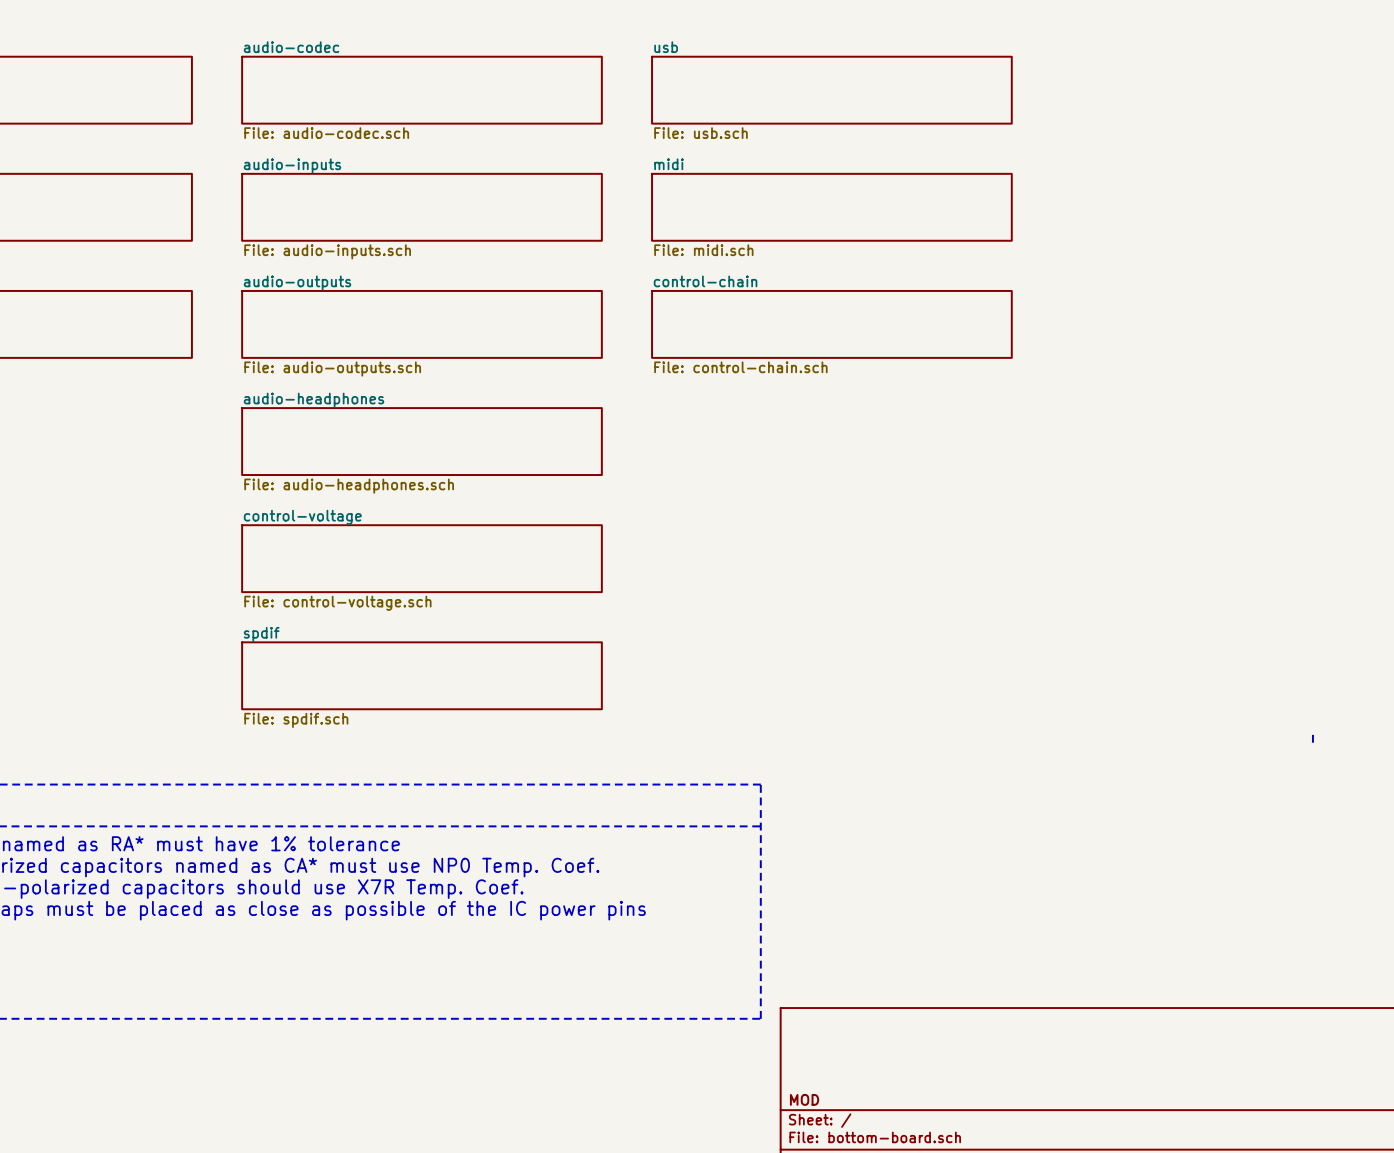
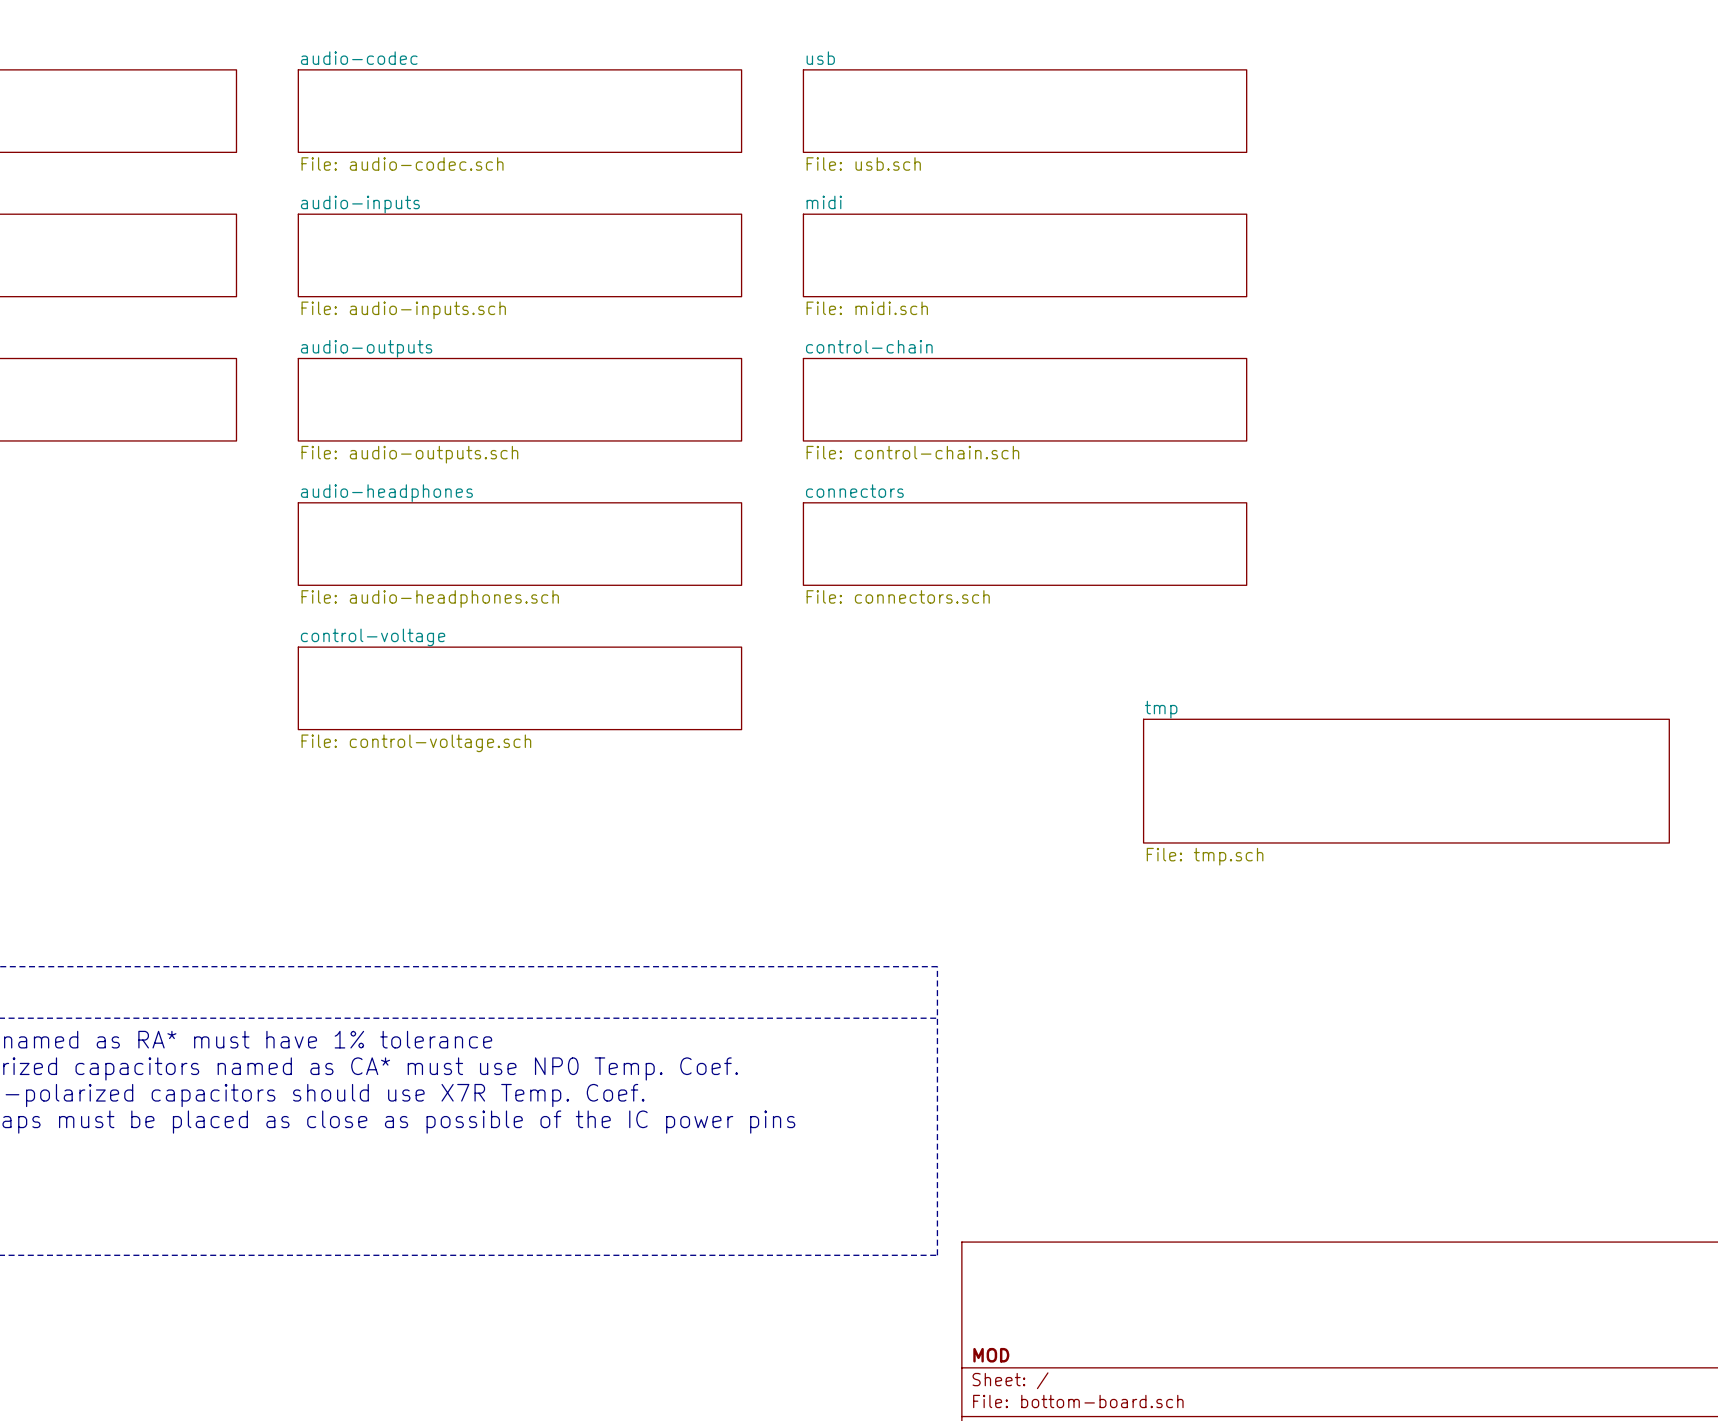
sheet connectors: none -> File: connectors.sch (1025, 544)
sheet tmp: none -> File: tmp.sch (1406, 781)
sheet spdif: File: spdif.sch (421, 675) -> none
line: (1312, 734) (1312, 742) -> none

